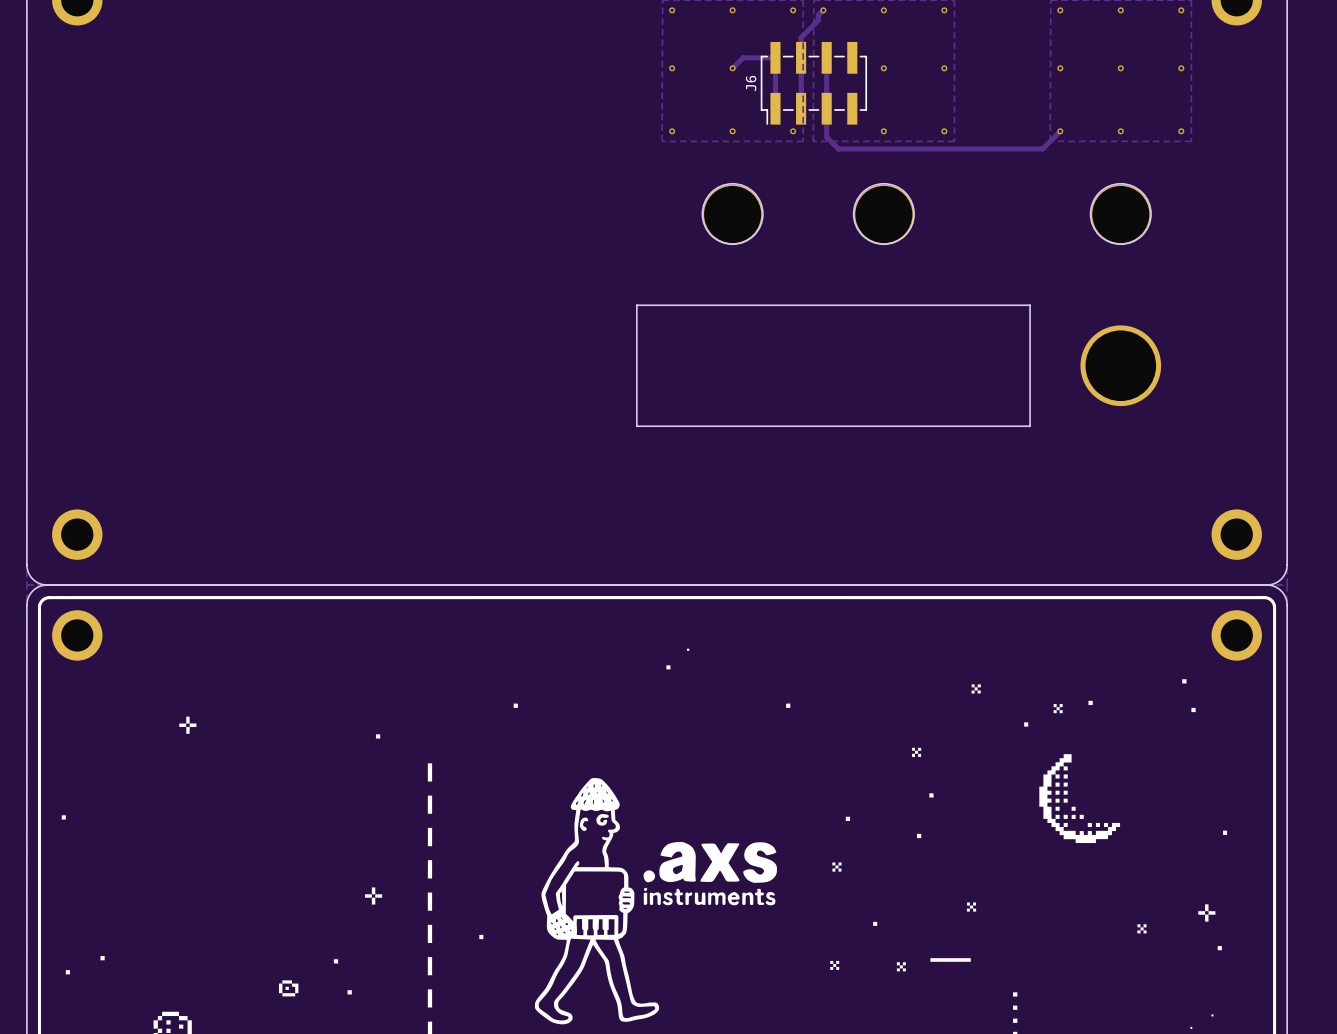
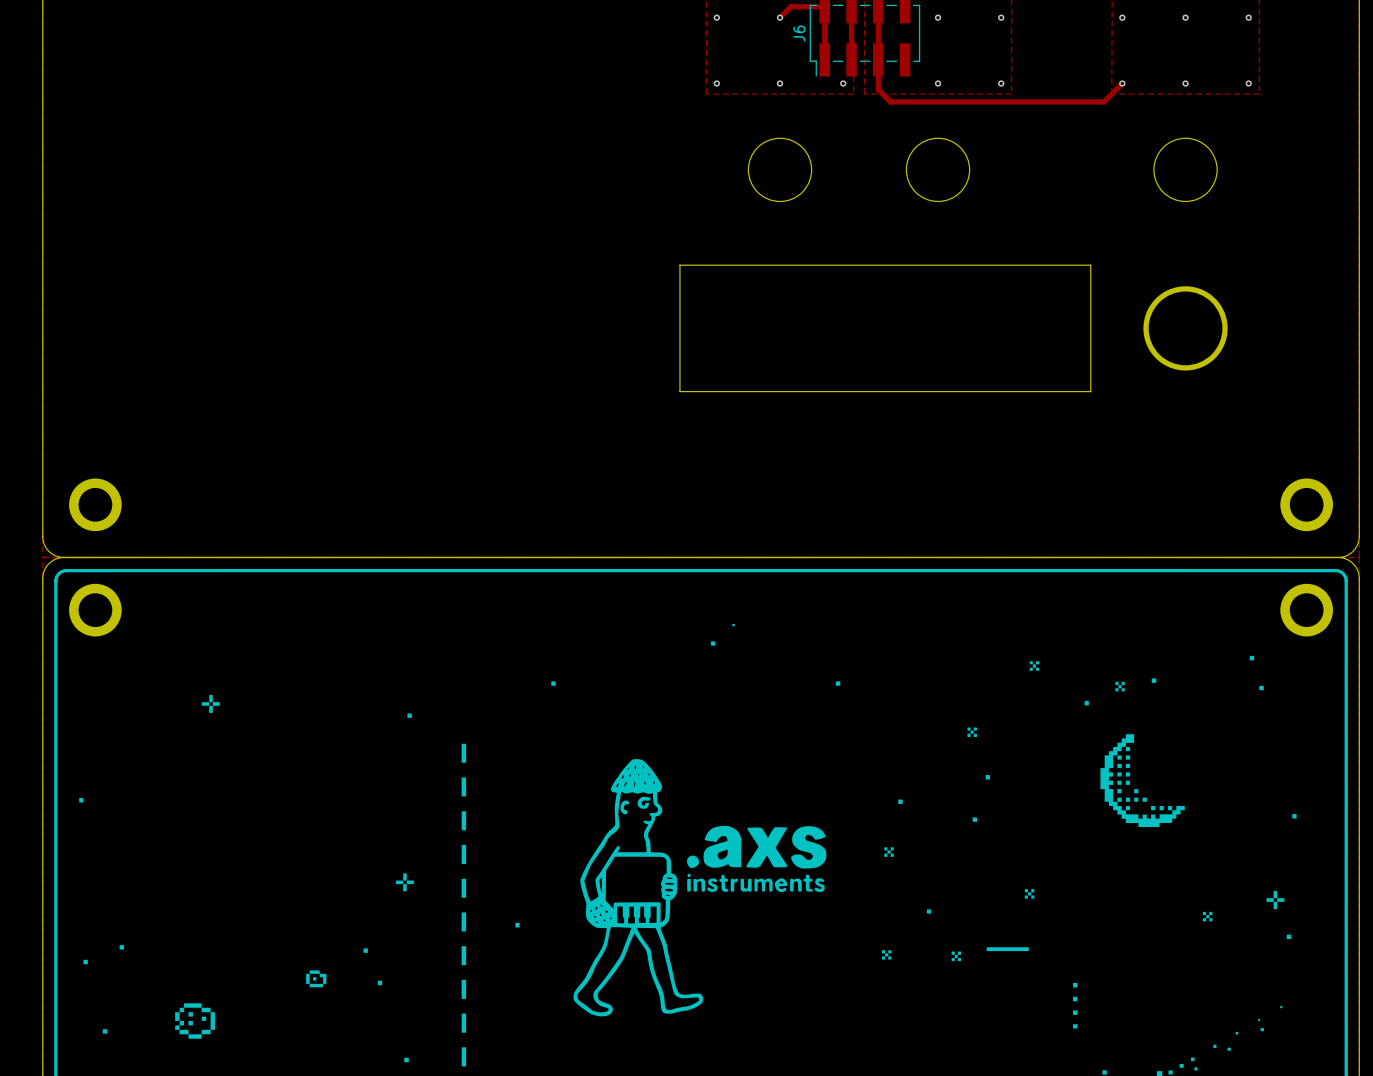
part: (732, 214) -> none
part: (883, 214) -> none
part: (1120, 214) -> none

